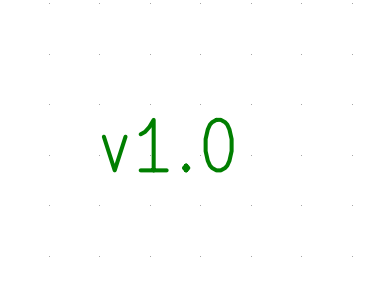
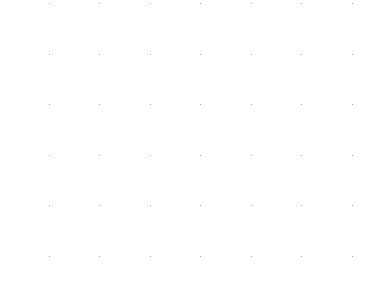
text: v1.0 (167, 145) -> none

